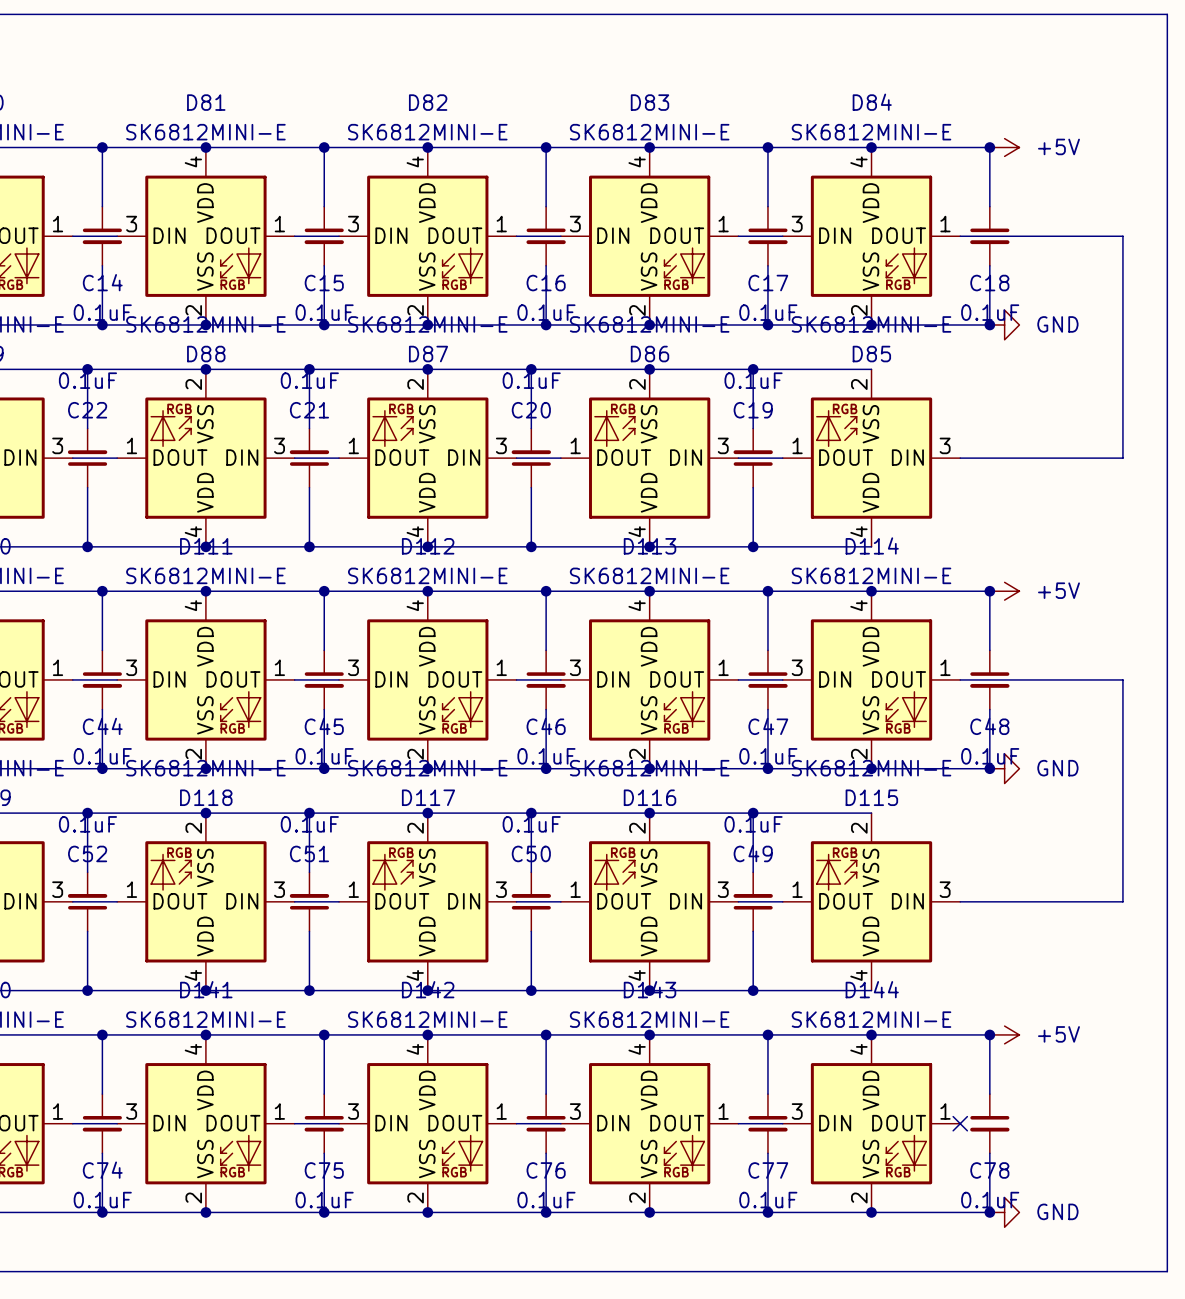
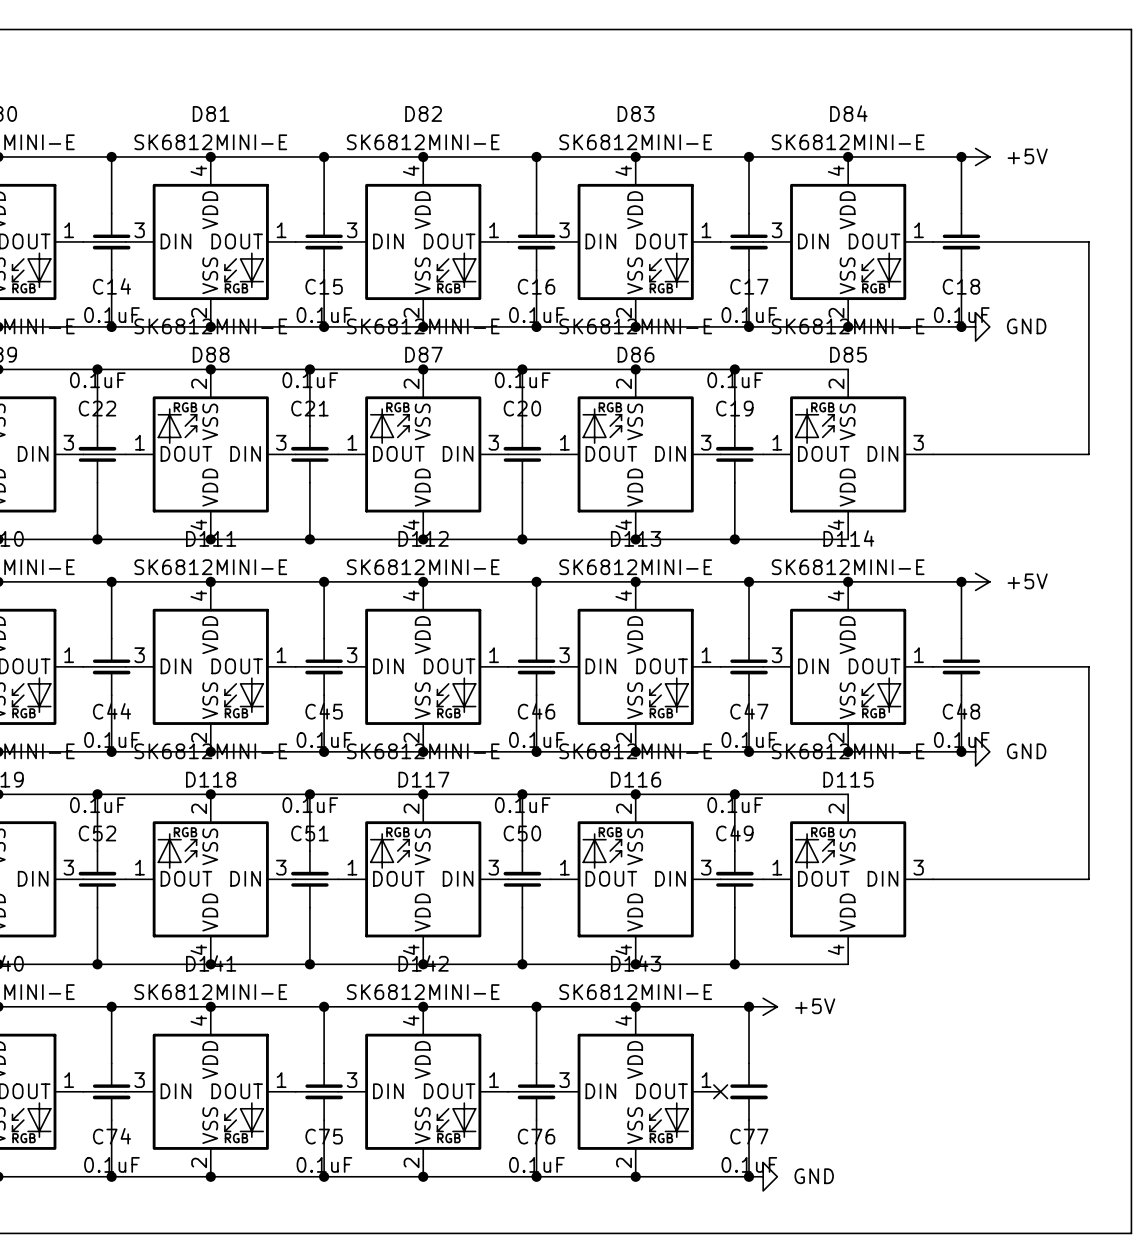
wire: (767, 1034) (989, 1034) (989, 1094) -> none
junction: (871, 1034) -> none
junction: (989, 1034) -> none
power symbol position: +5V (1004, 1034) -> +5V (763, 1006)
wire: (738, 1123) (782, 1123) -> none
no-connect mark: none -> (720, 1091)
D144: SK6812MINI-E (871, 1123) -> none
no-connect mark: (960, 1123) -> none
C78: 0.1uF (989, 1123) -> none
wire: (989, 1153) (989, 1212) (767, 1212) -> none
junction: (871, 1212) -> none
junction: (989, 1212) -> none
power symbol position: GND (1004, 1212) -> GND (763, 1176)

